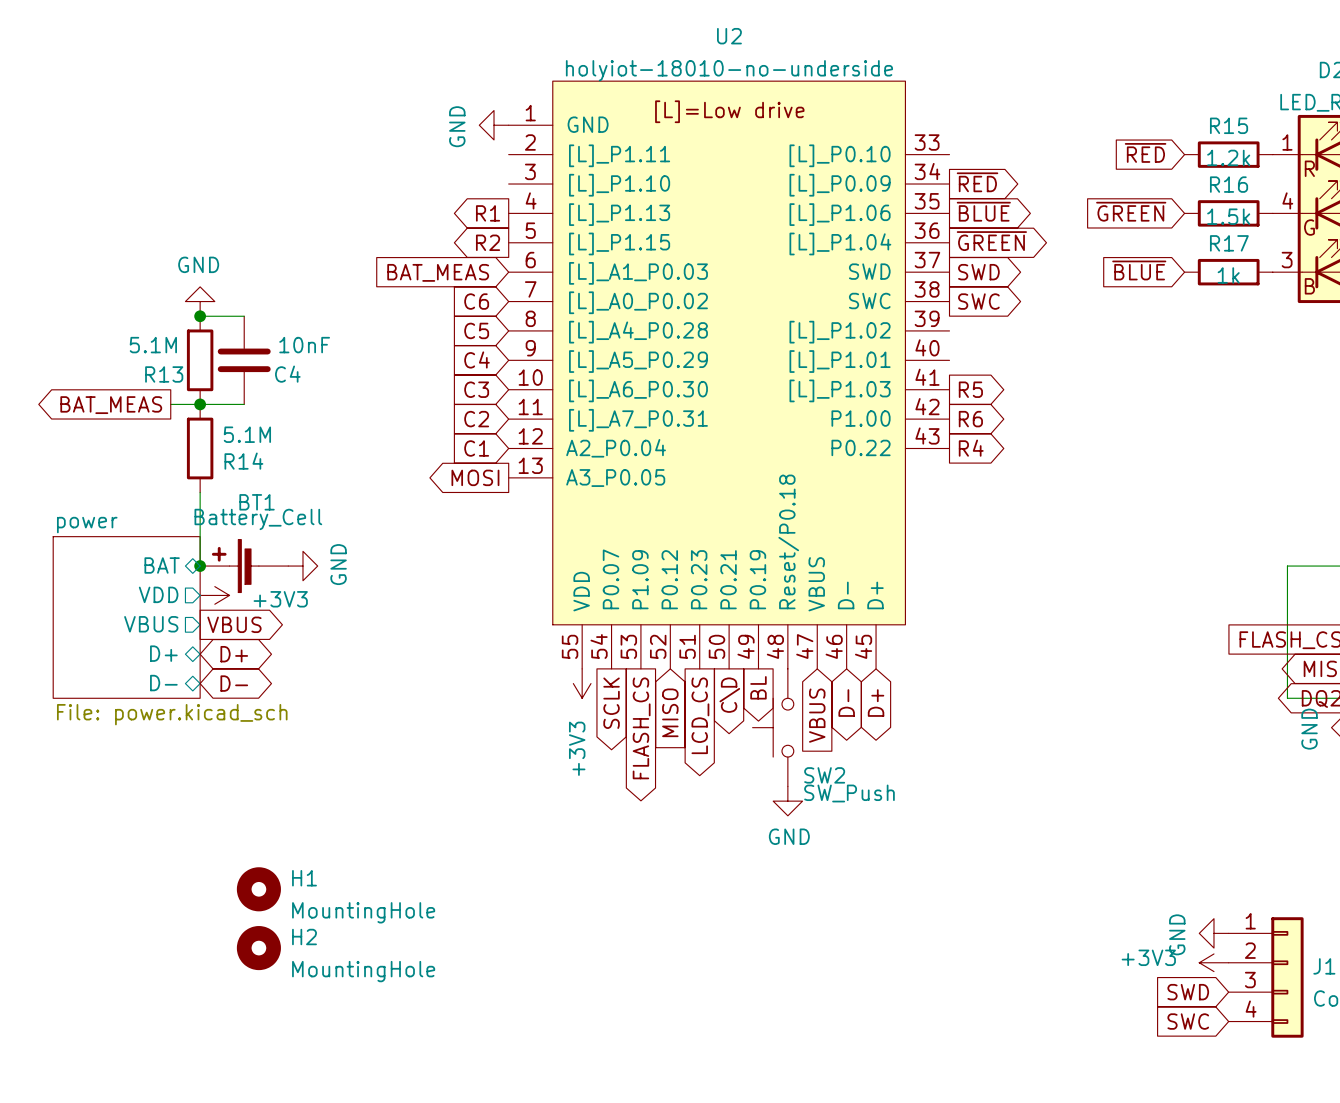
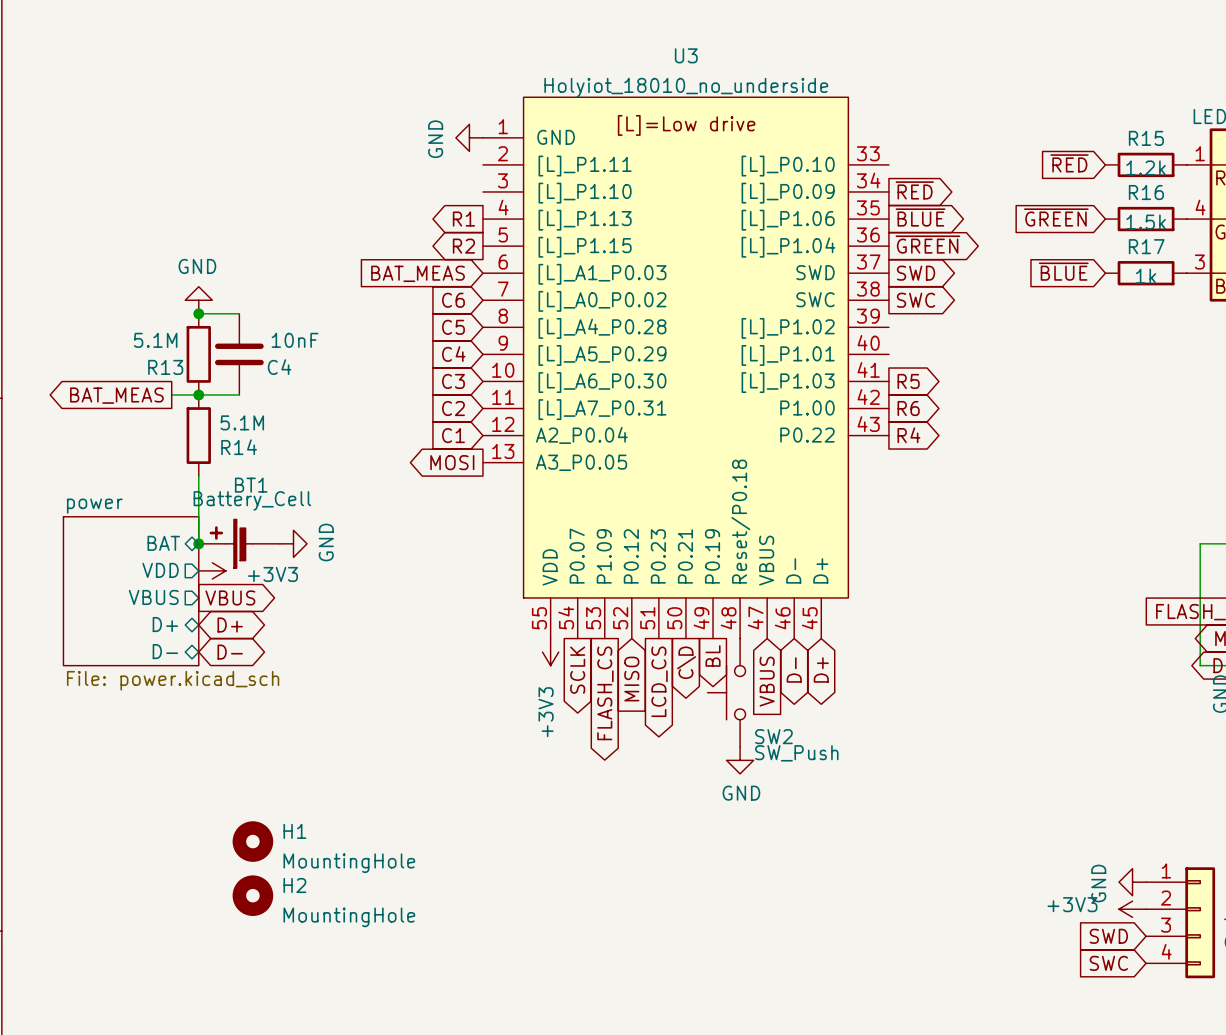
U2 name: U2 (729, 36) -> U3 (686, 55)
U2 value: holyiot-18010-no-underside (729, 70) -> Holyiot_18010_no_underside (686, 87)

